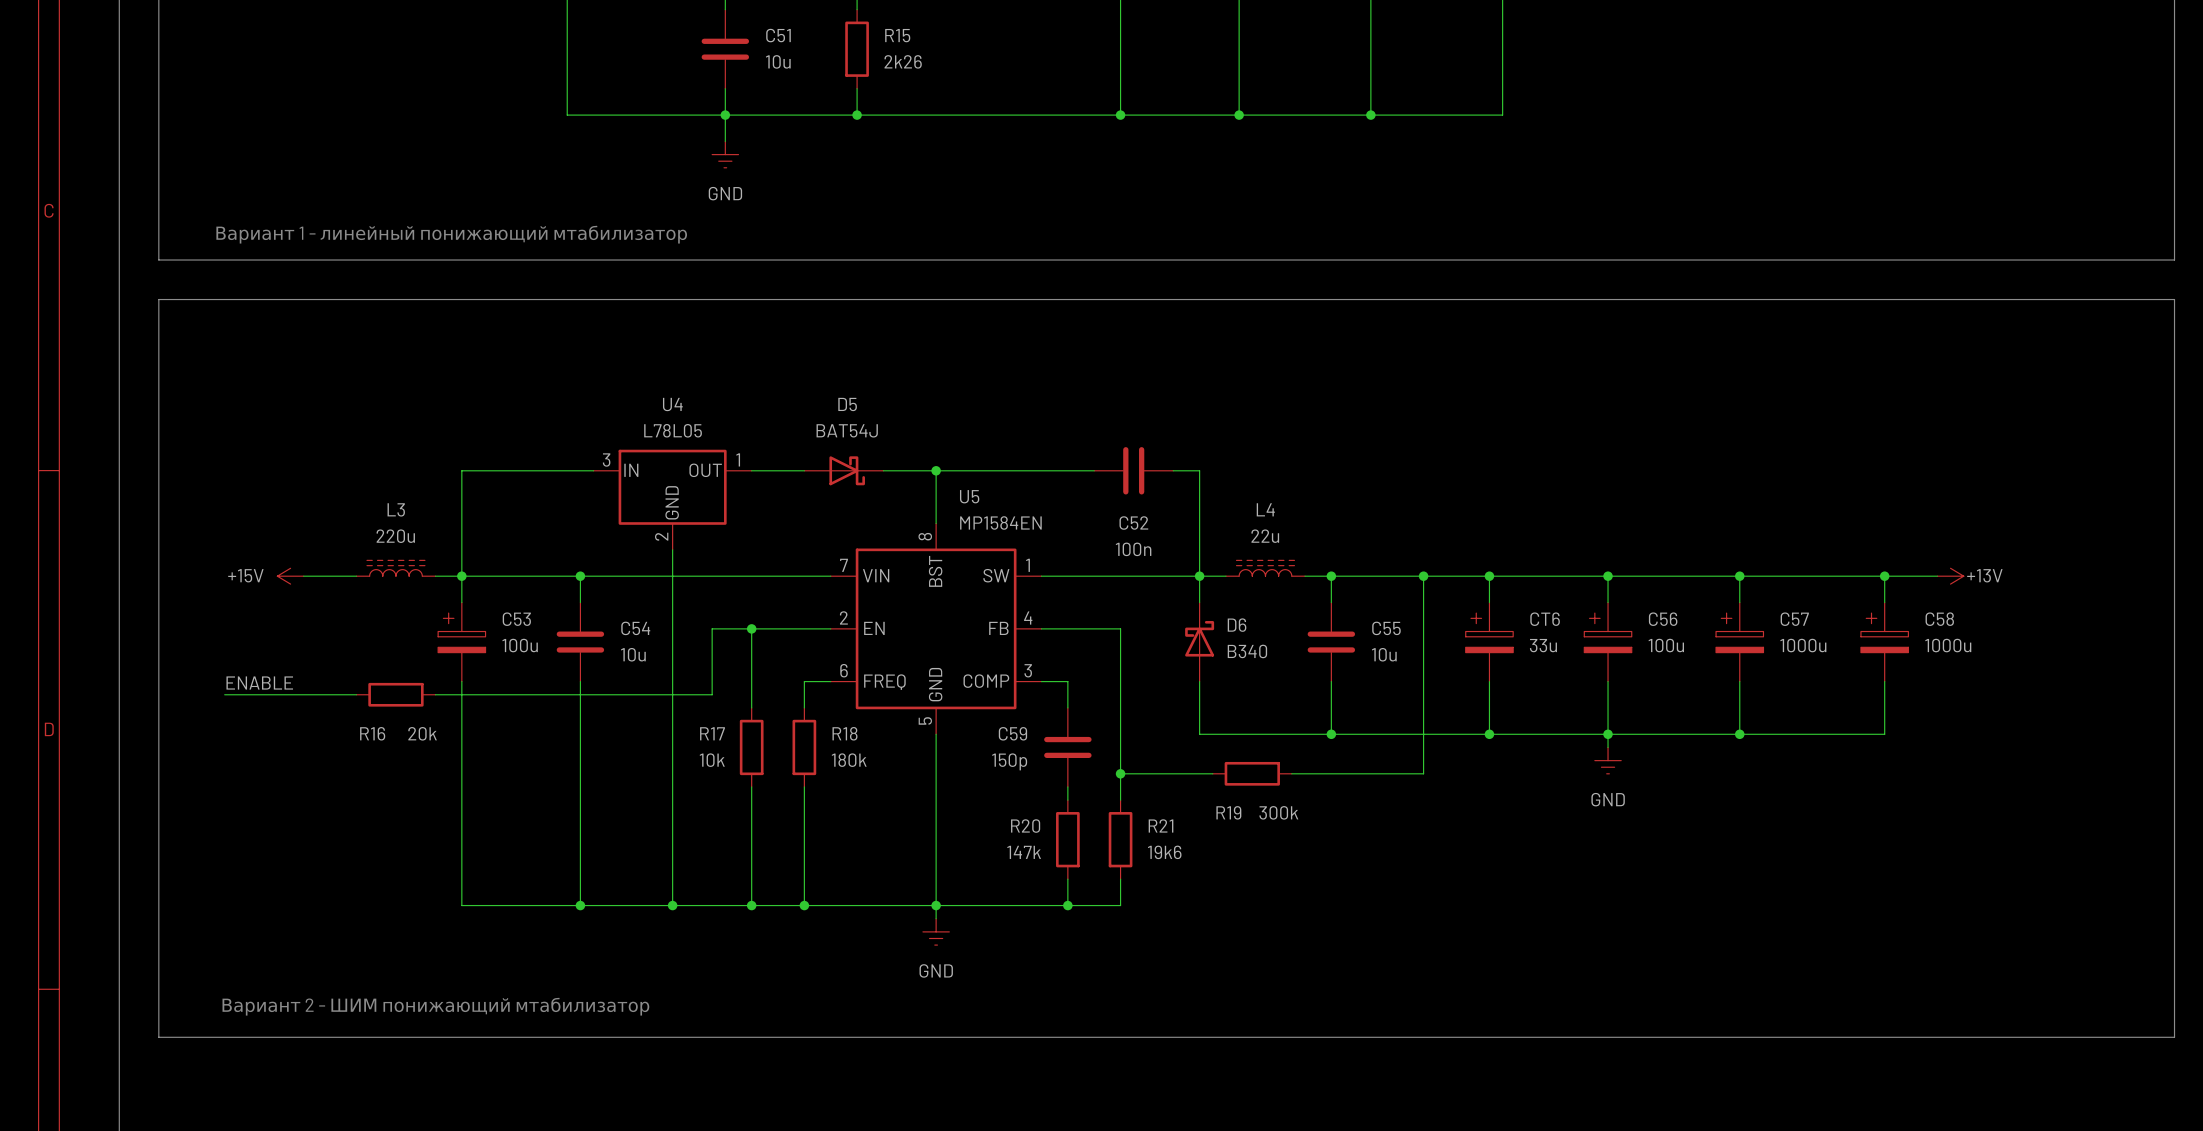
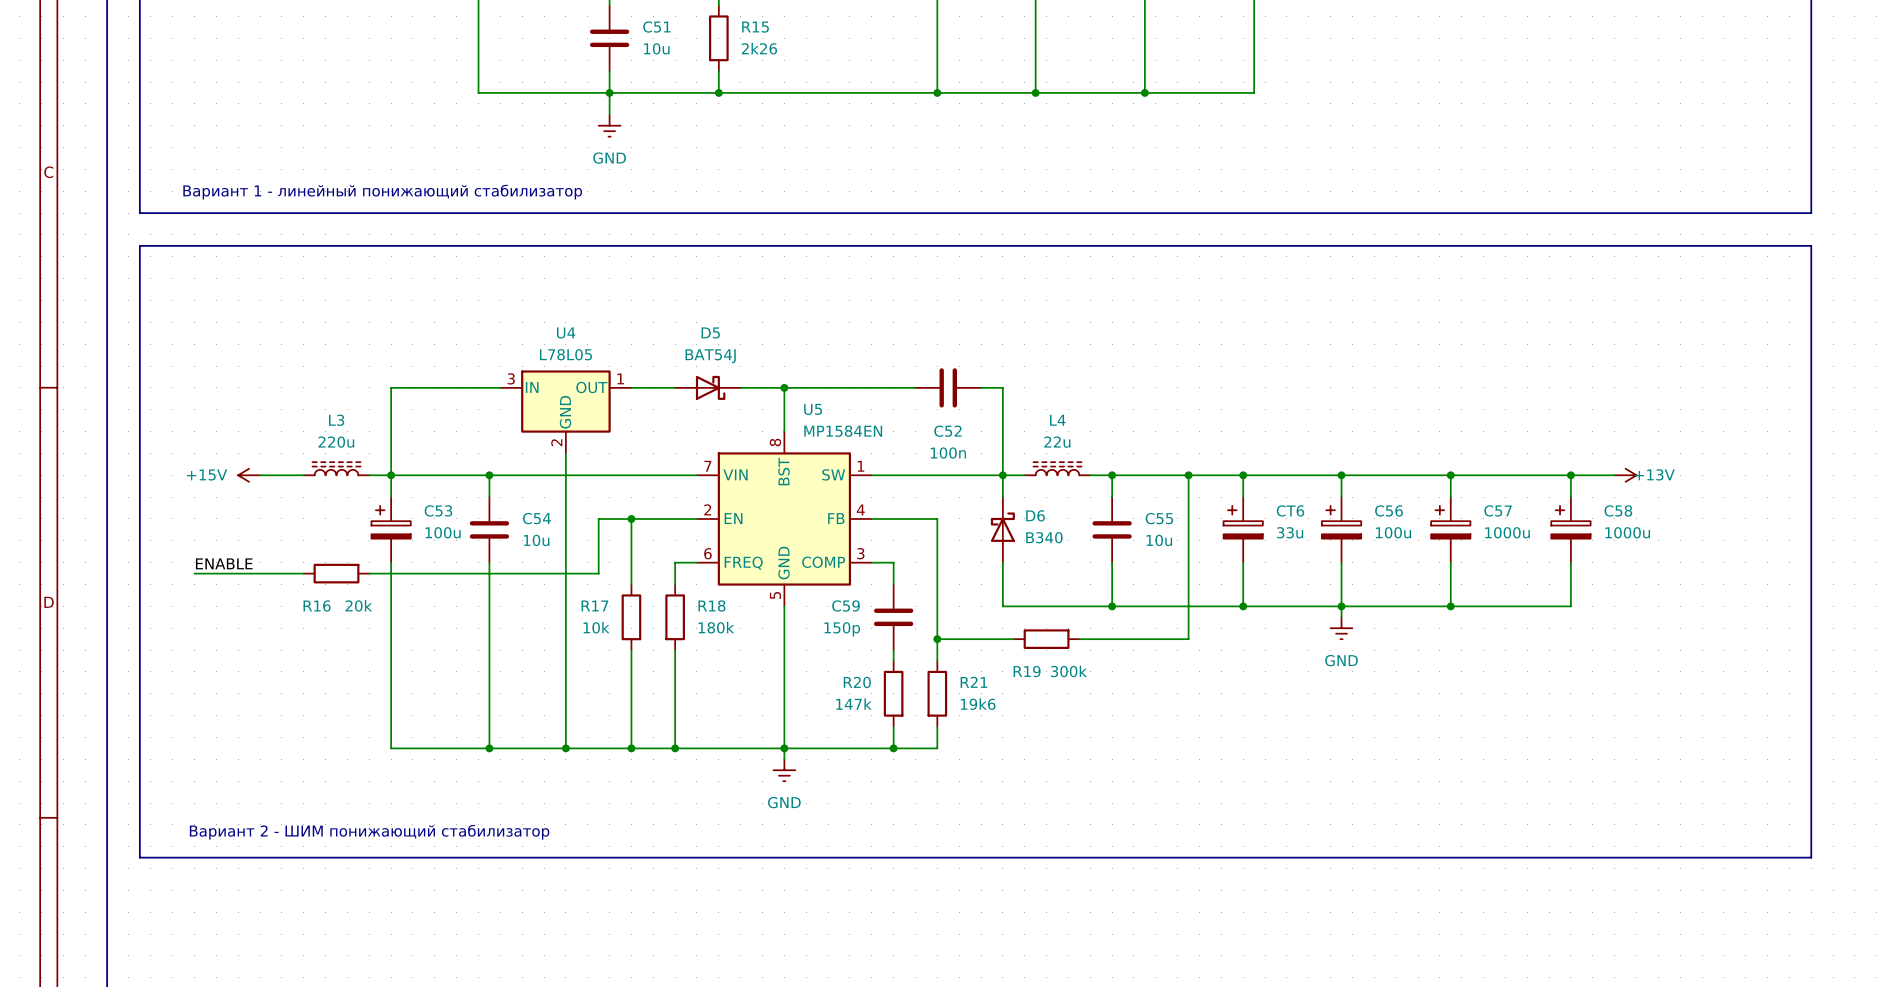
text: Вариант 1 - линейный понижающий мтабилизатор (451, 234) -> Вариант 1 - линейный понижающий cтабилизатор (382, 192)
text: Вариант 2 - ШИМ понижающий мтабилизатор (435, 1006) -> Вариант 2 - ШИМ понижающий cтабилизатор (369, 832)

